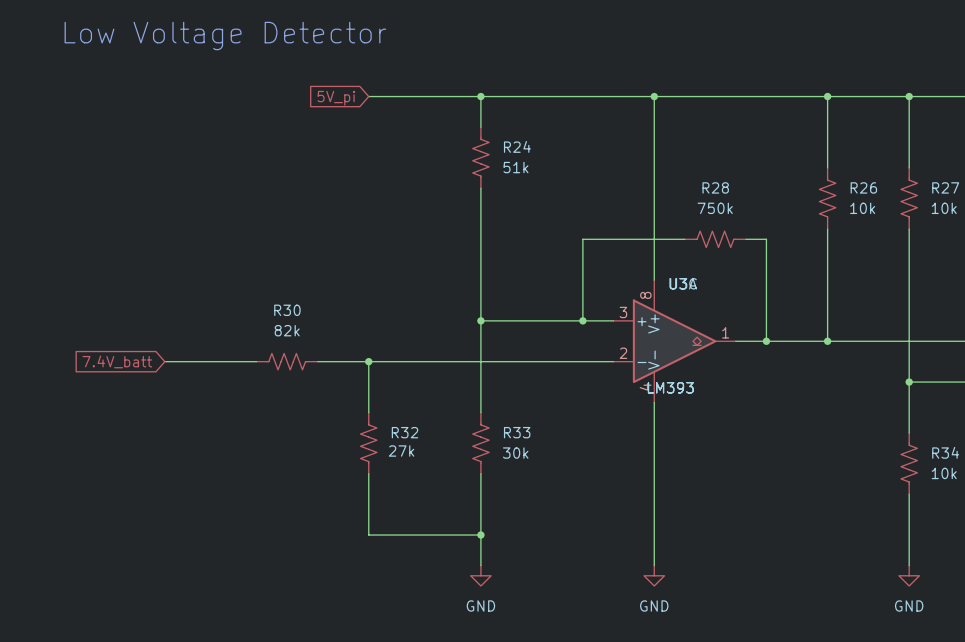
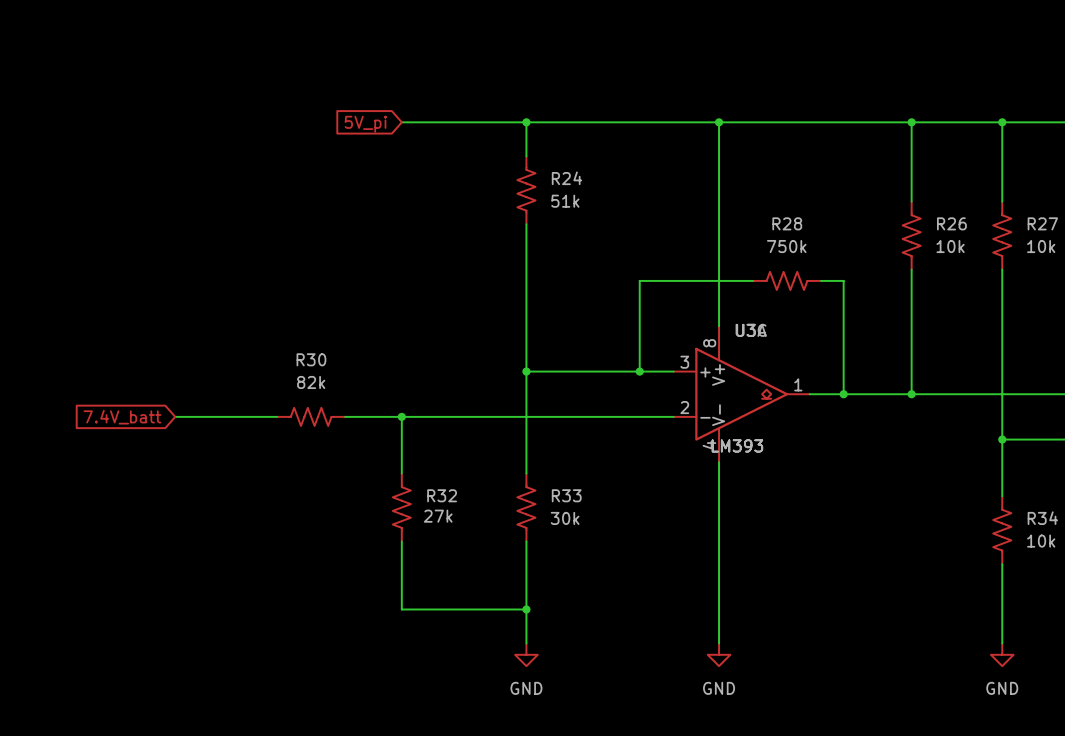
text: Low Voltage Detector (225, 36) -> none

